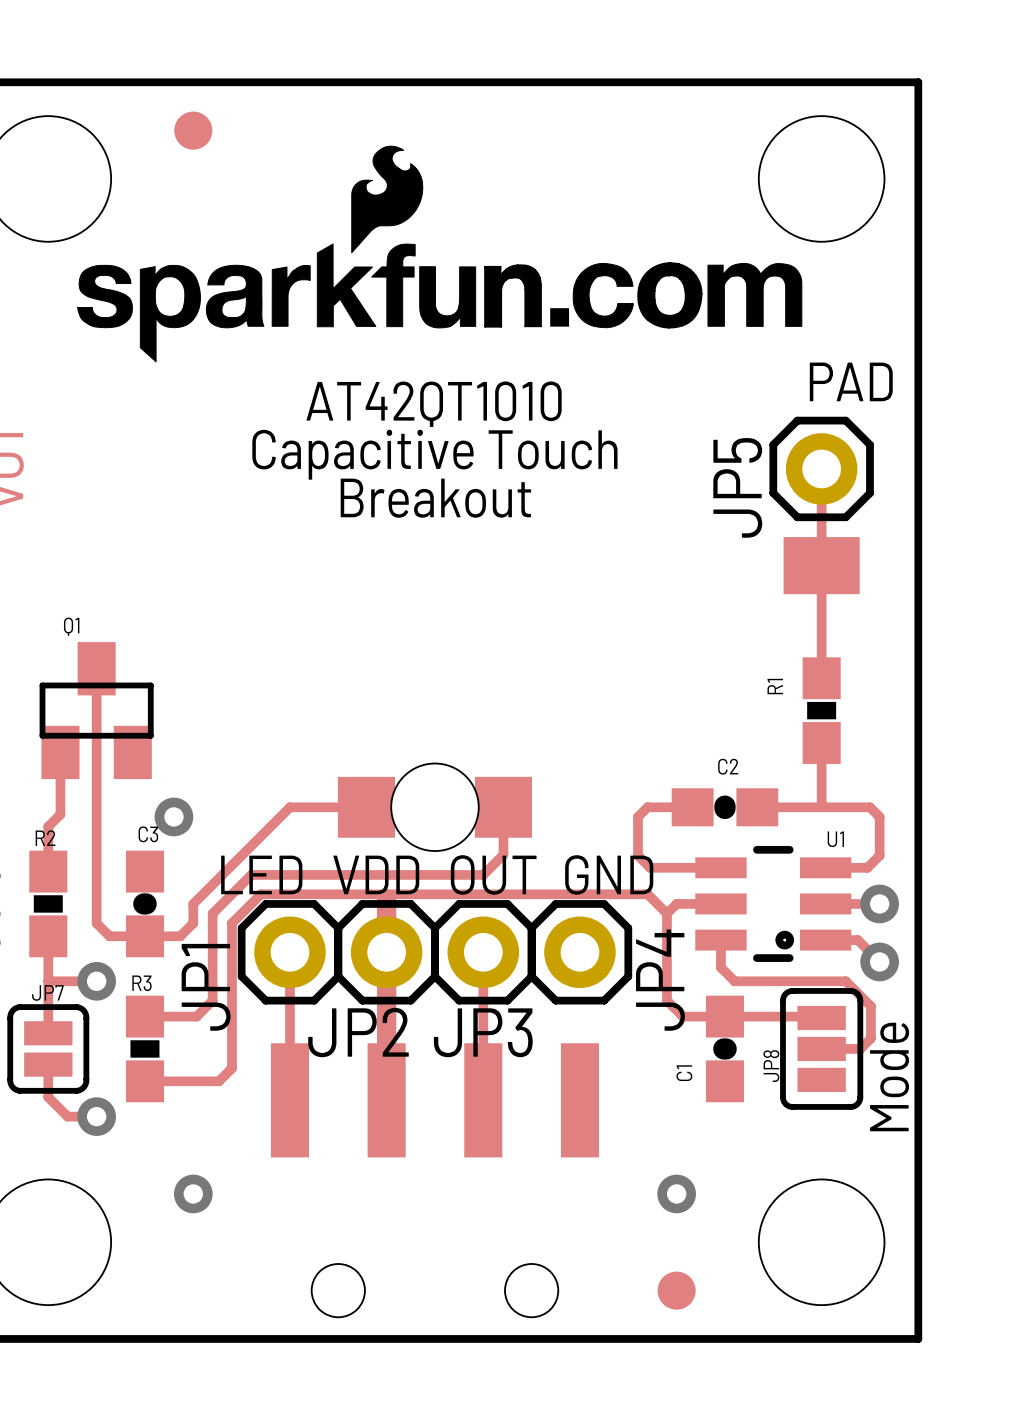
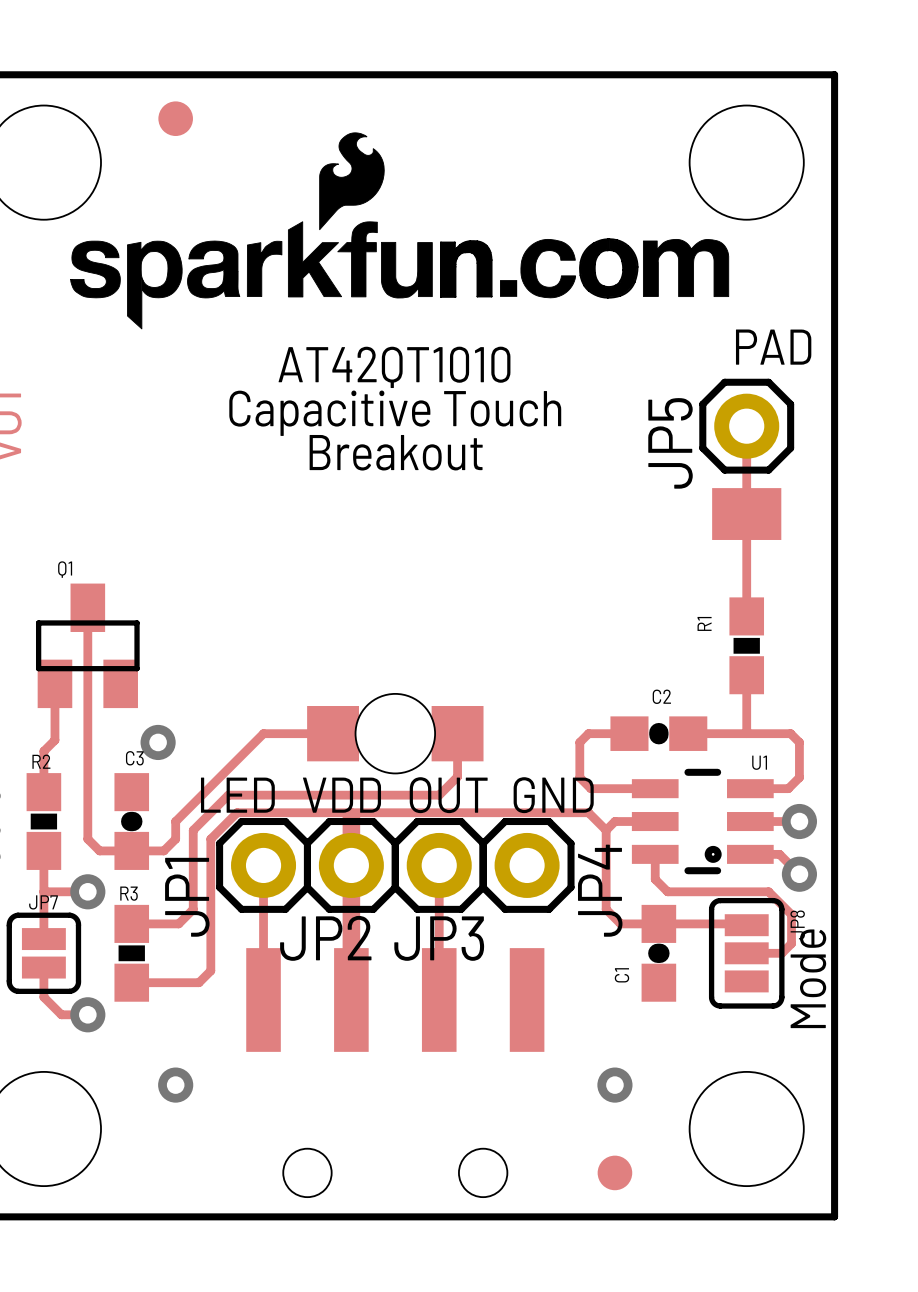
JP8 name position: JP8 (771, 1066) -> JP8 (797, 924)

